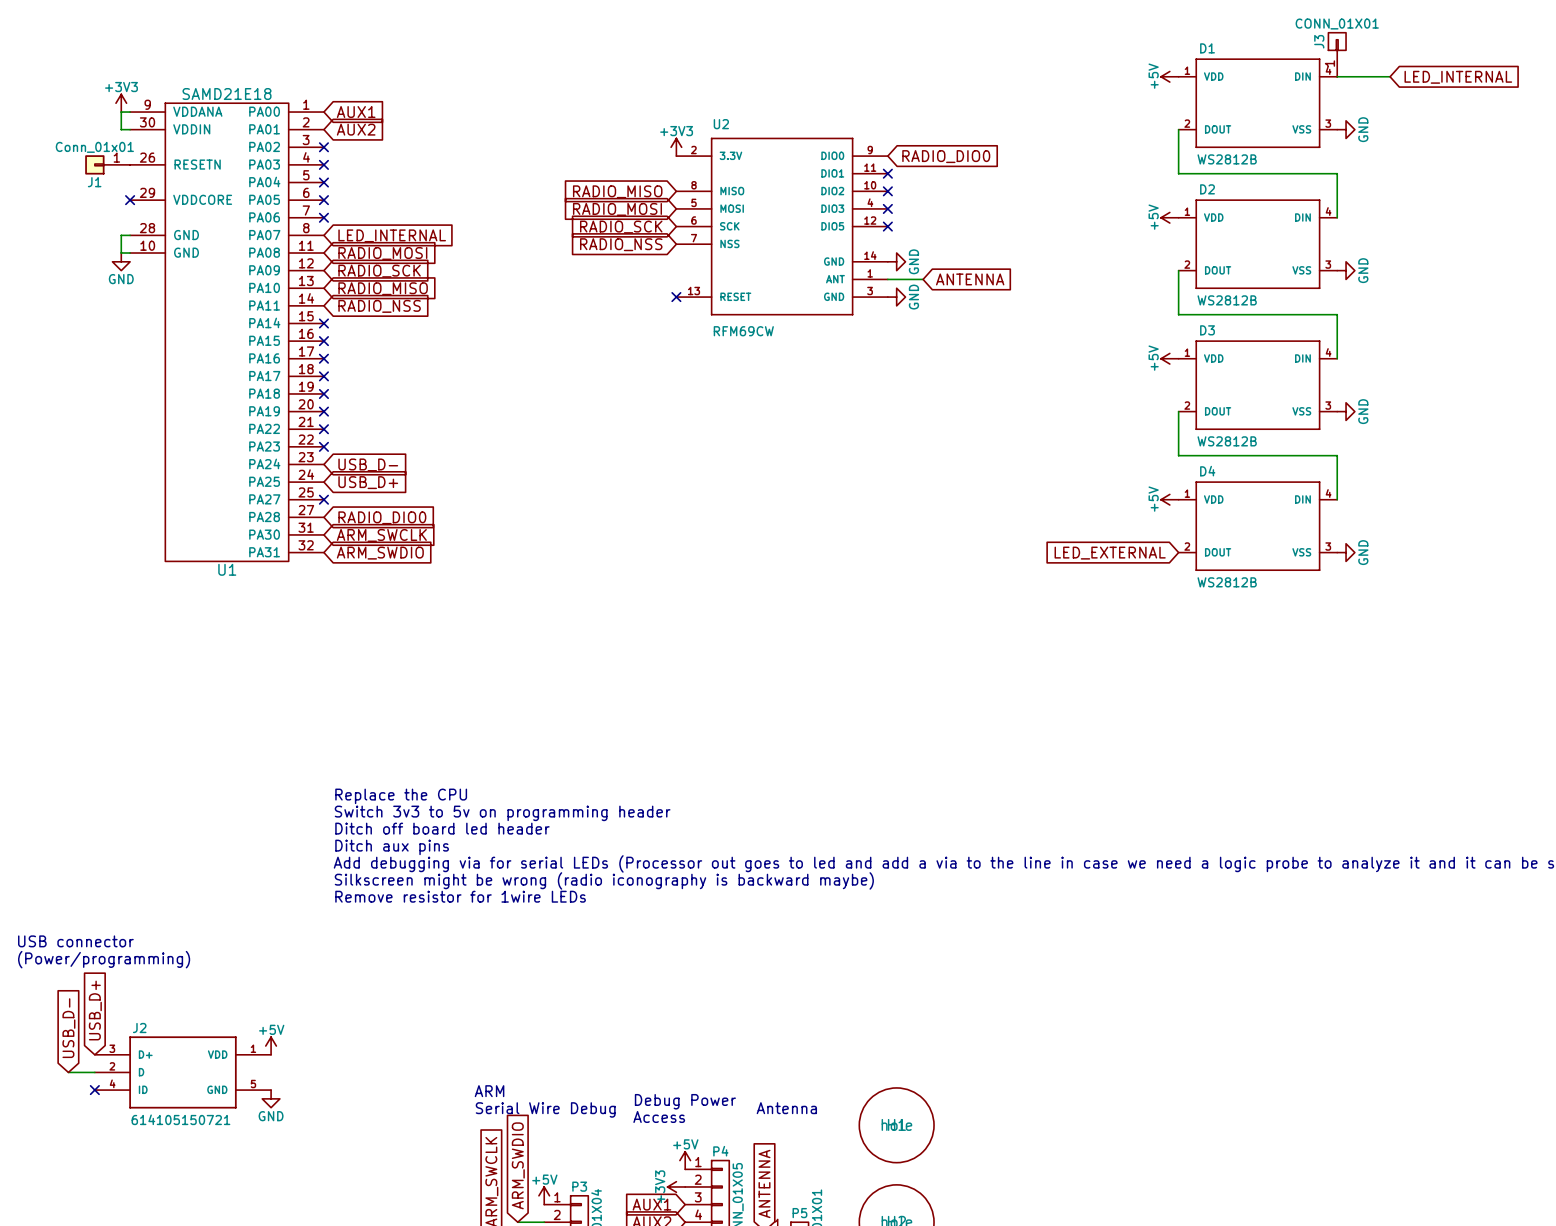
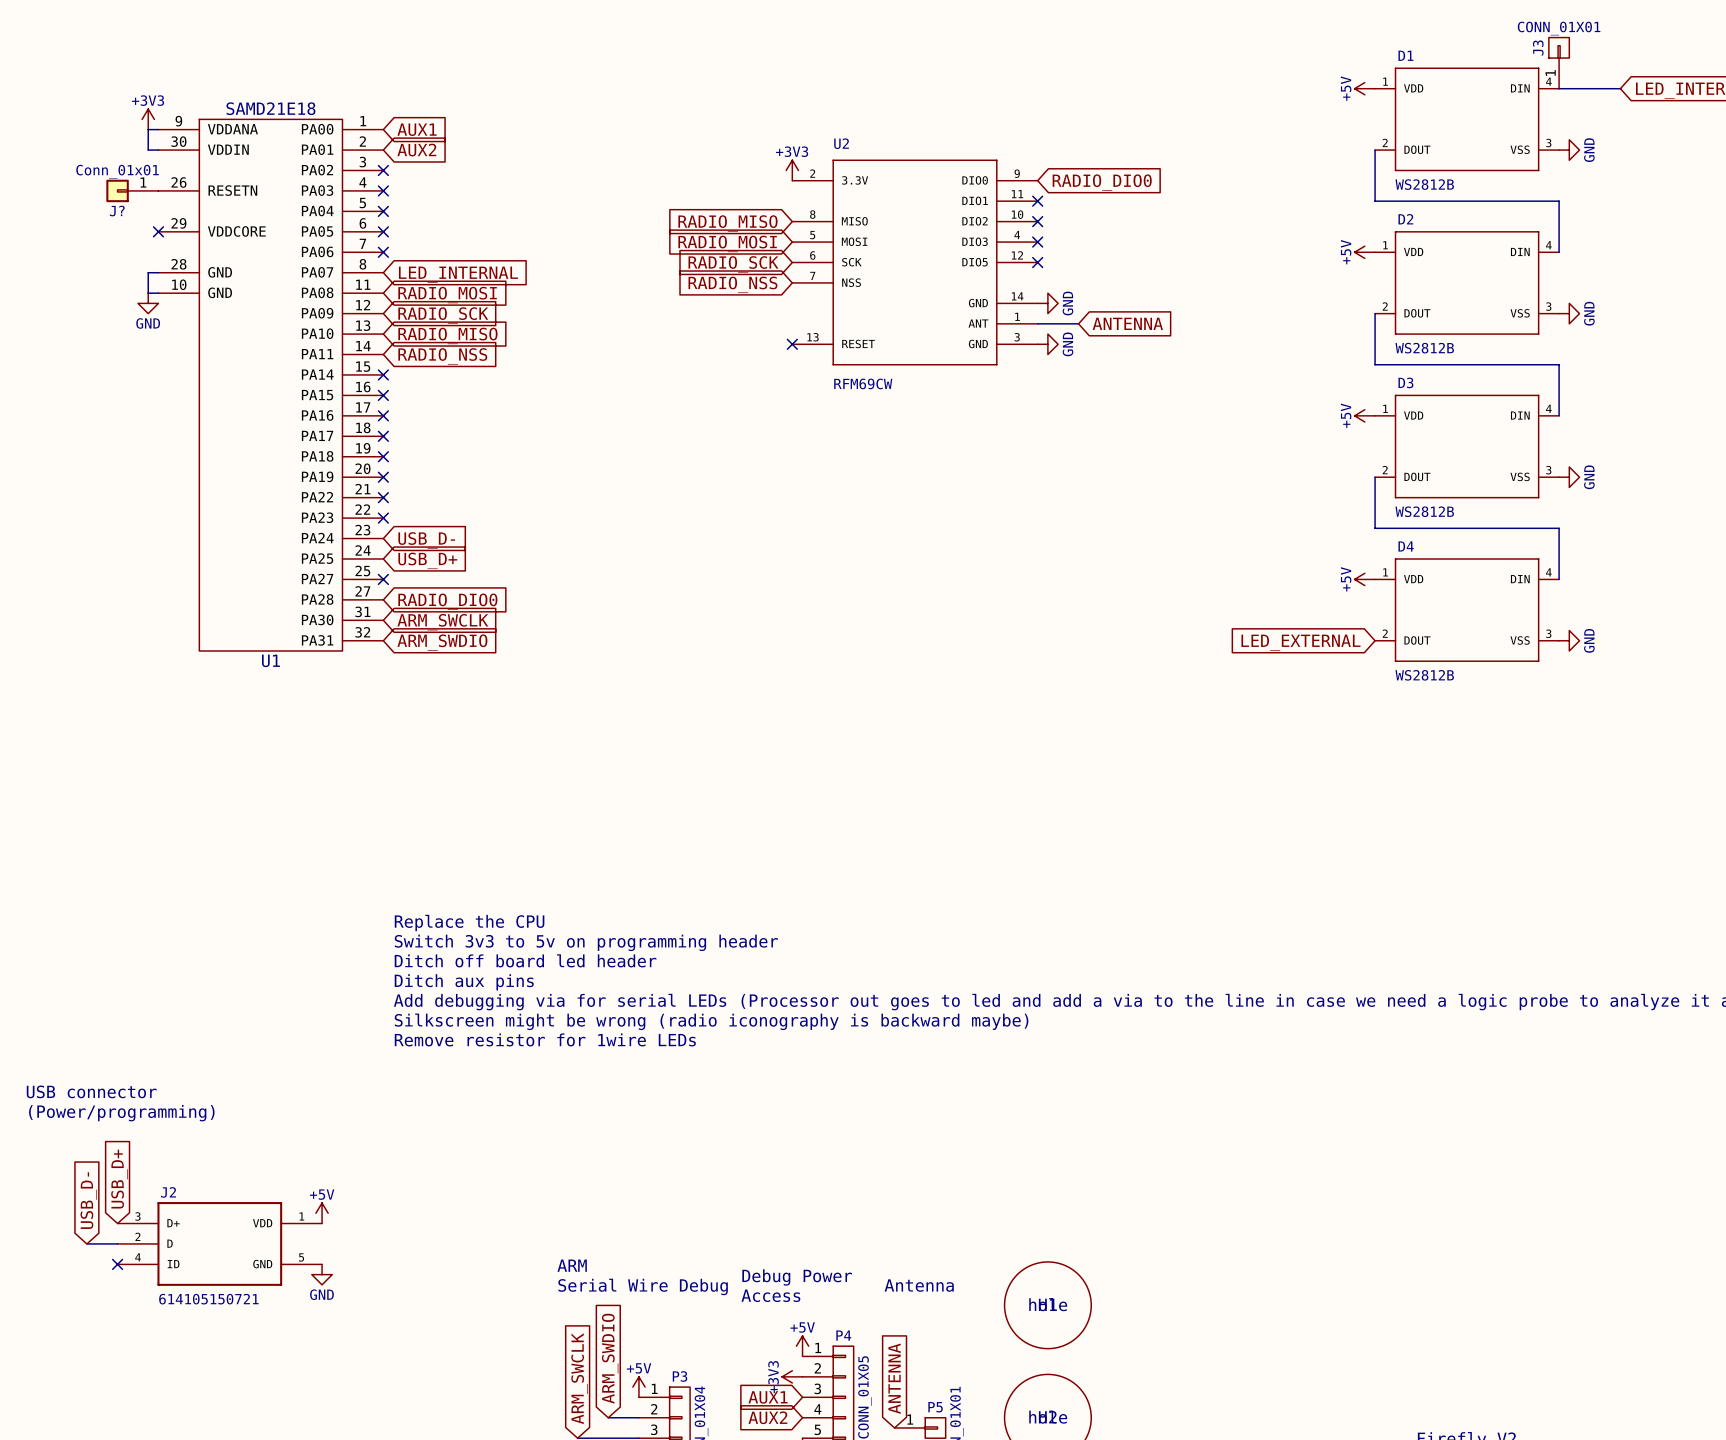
J1 name: J1 (94, 182) -> J? (117, 211)

